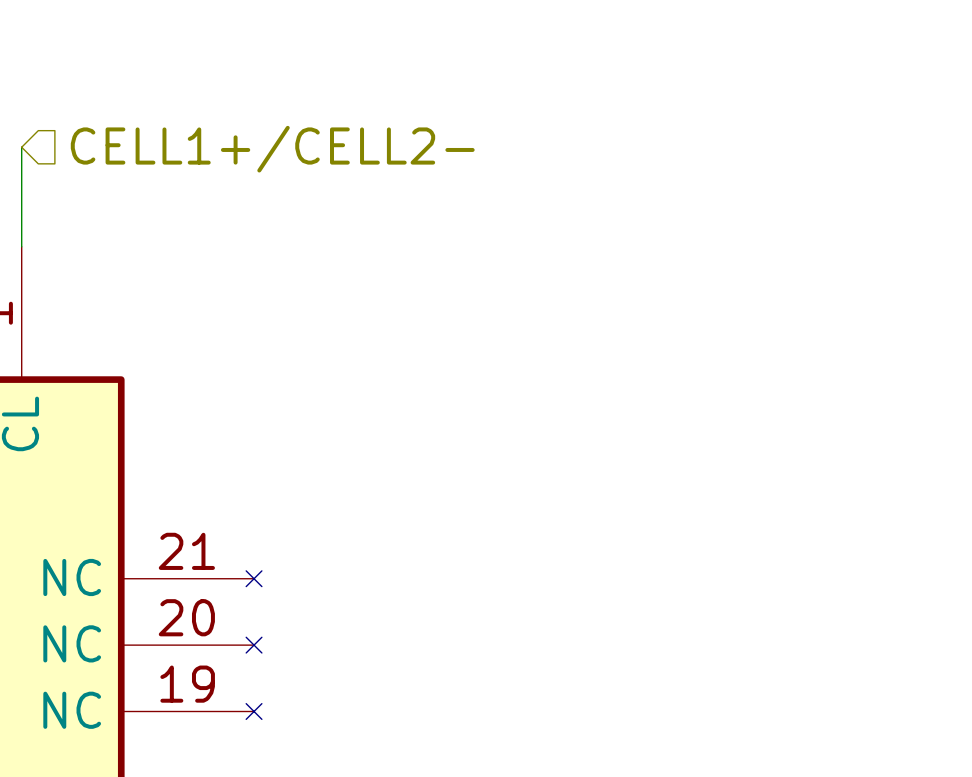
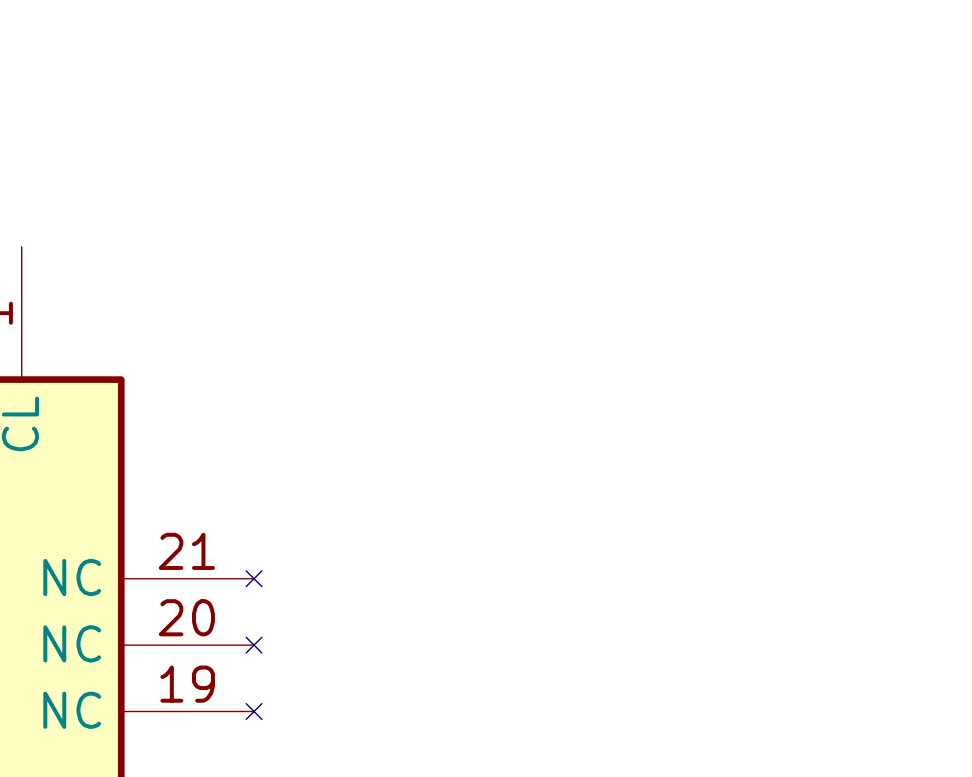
wire: (21, 147) (21, 246) -> none
hierarchical label: CELL1+/CELL2- (272, 149) -> none

